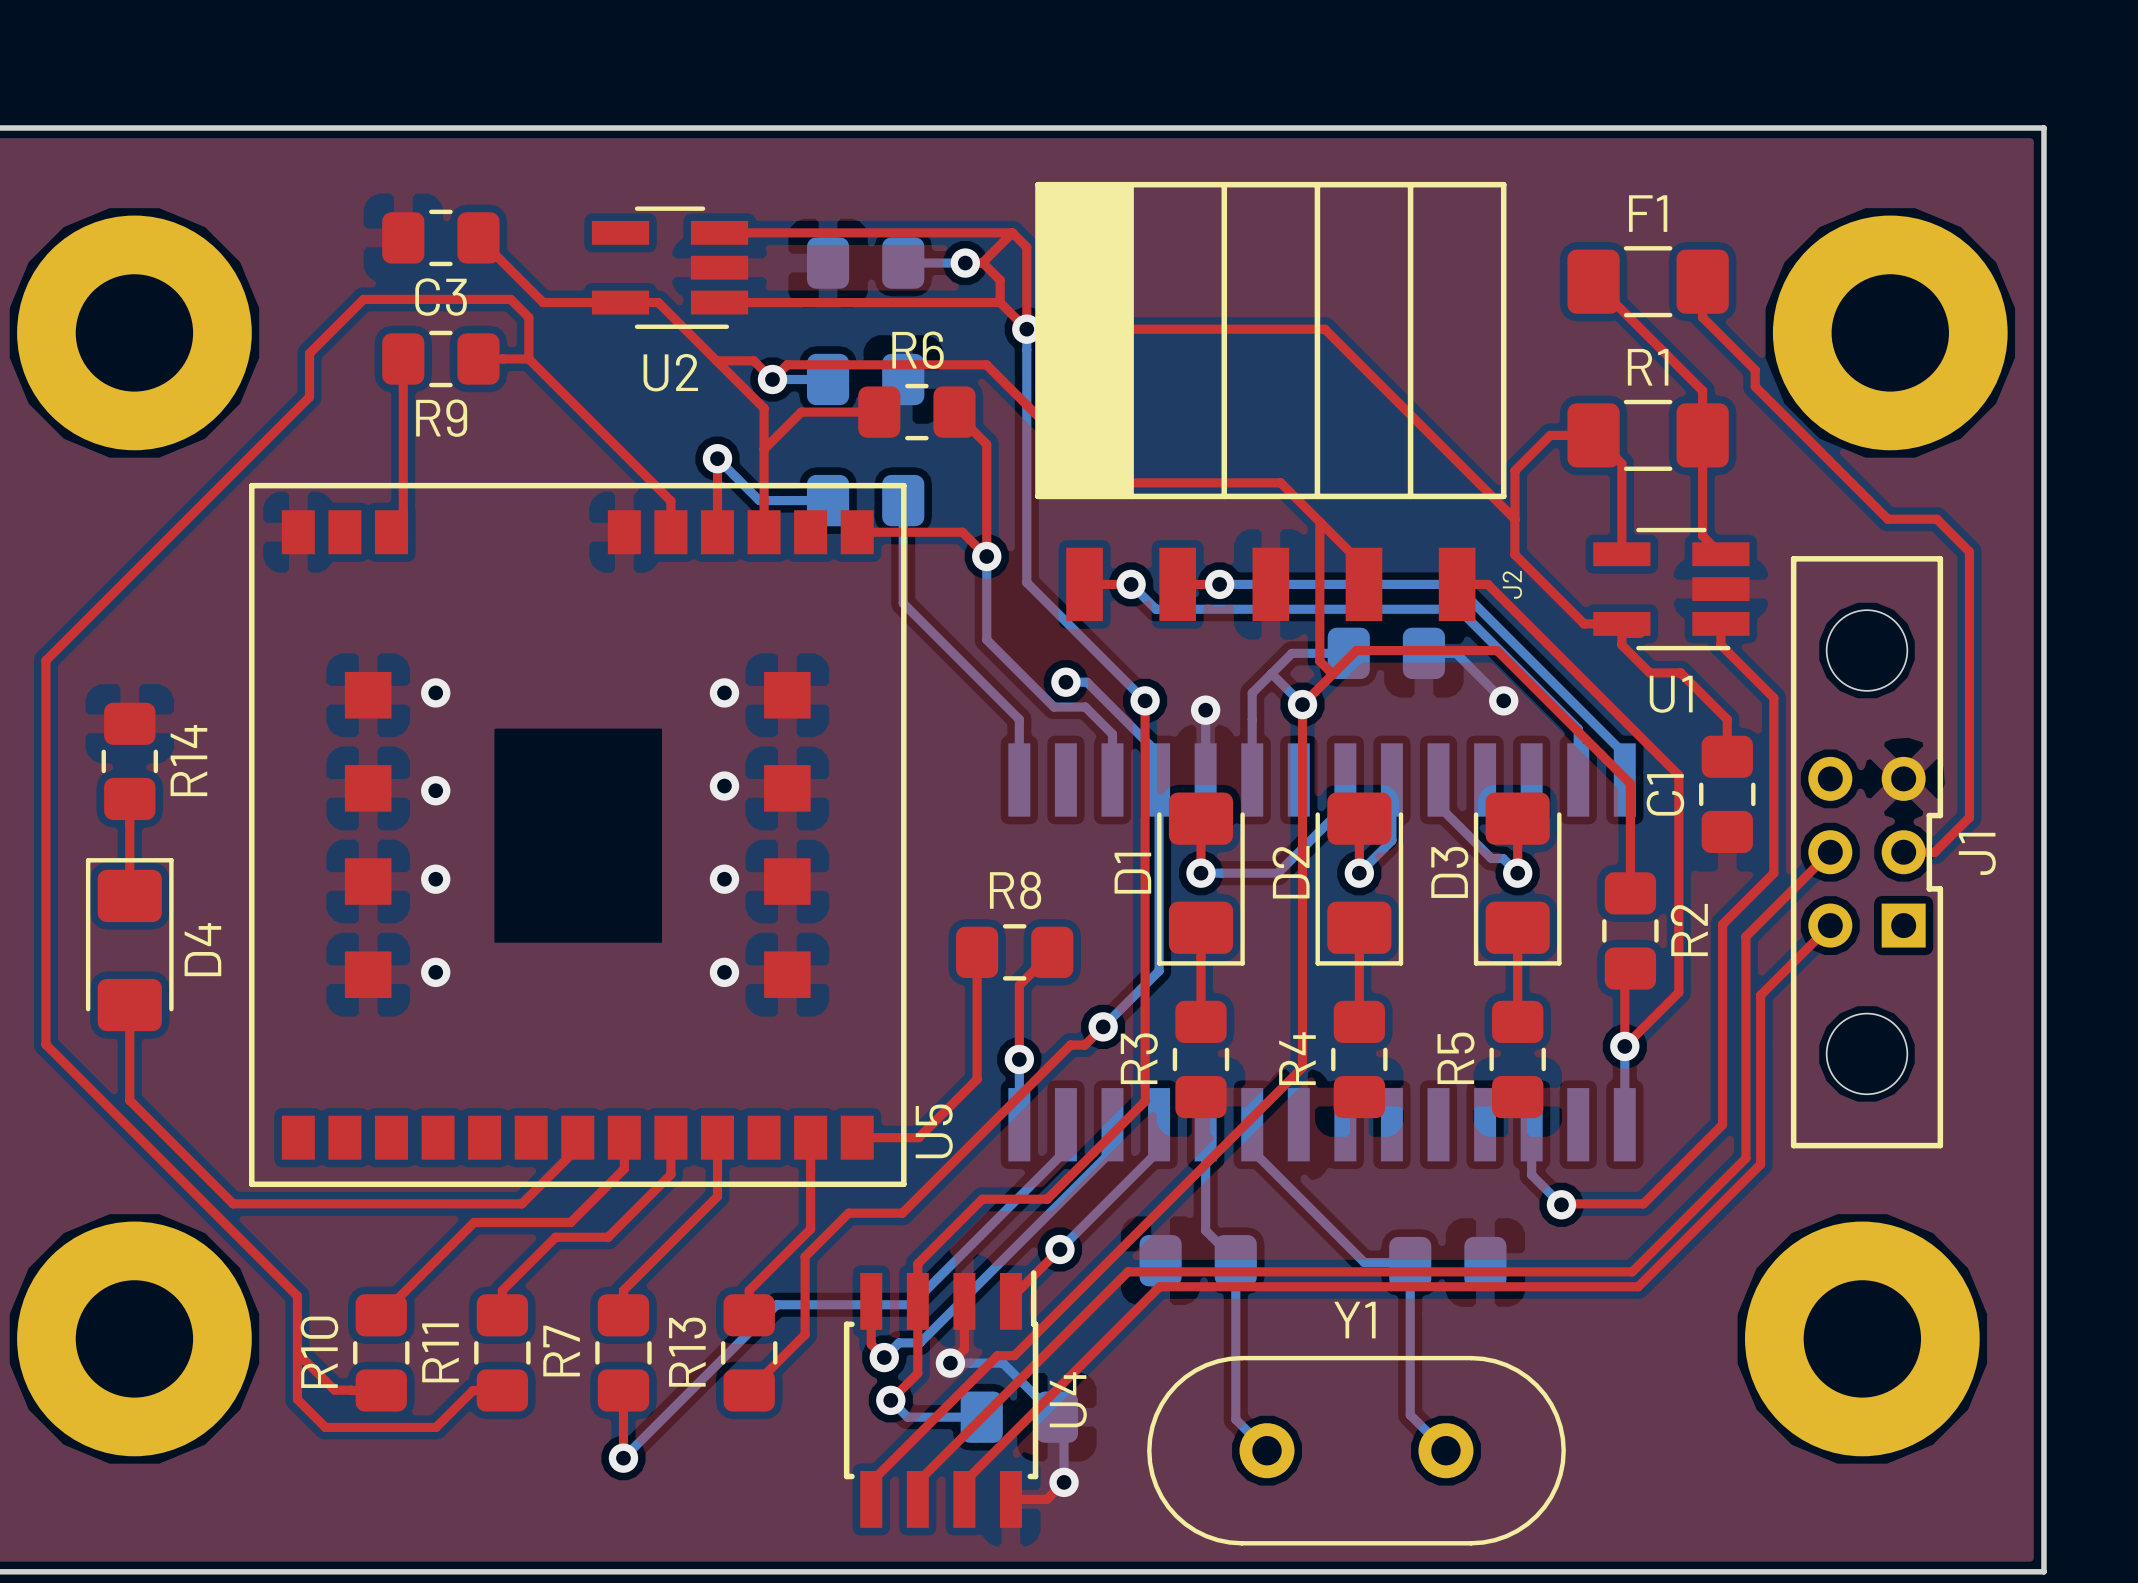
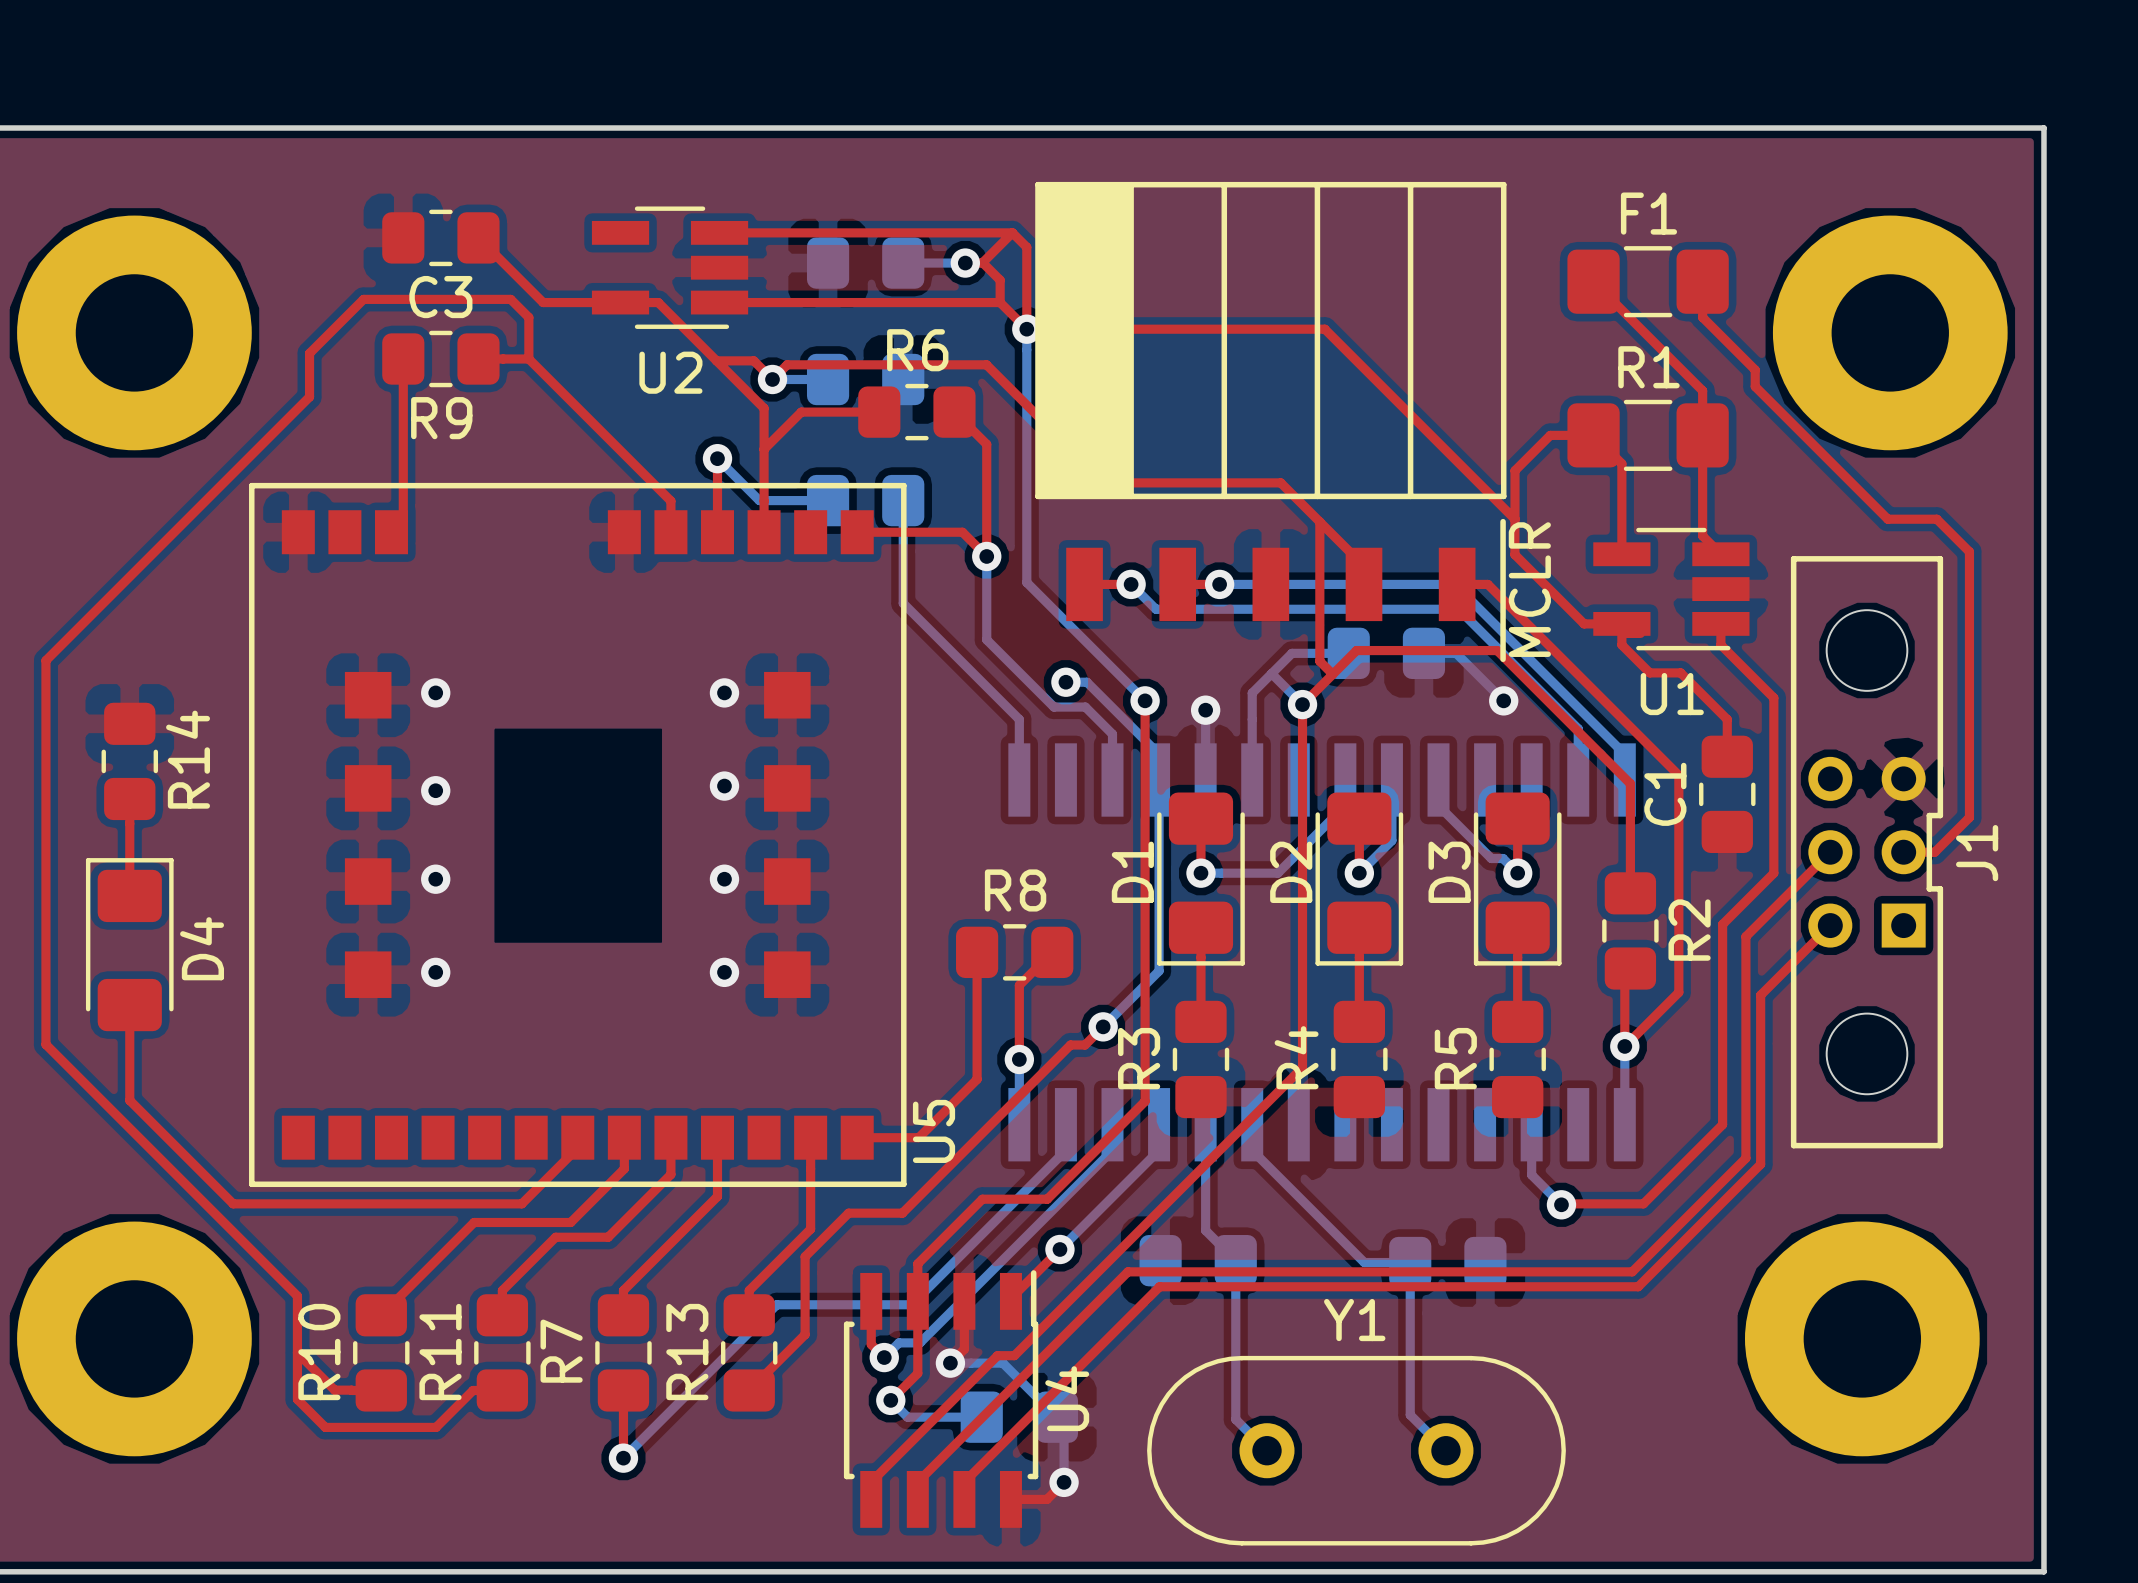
J2 name: J2 (1512, 584) -> none
text: none -> ~{MCLR} (1525, 590)

